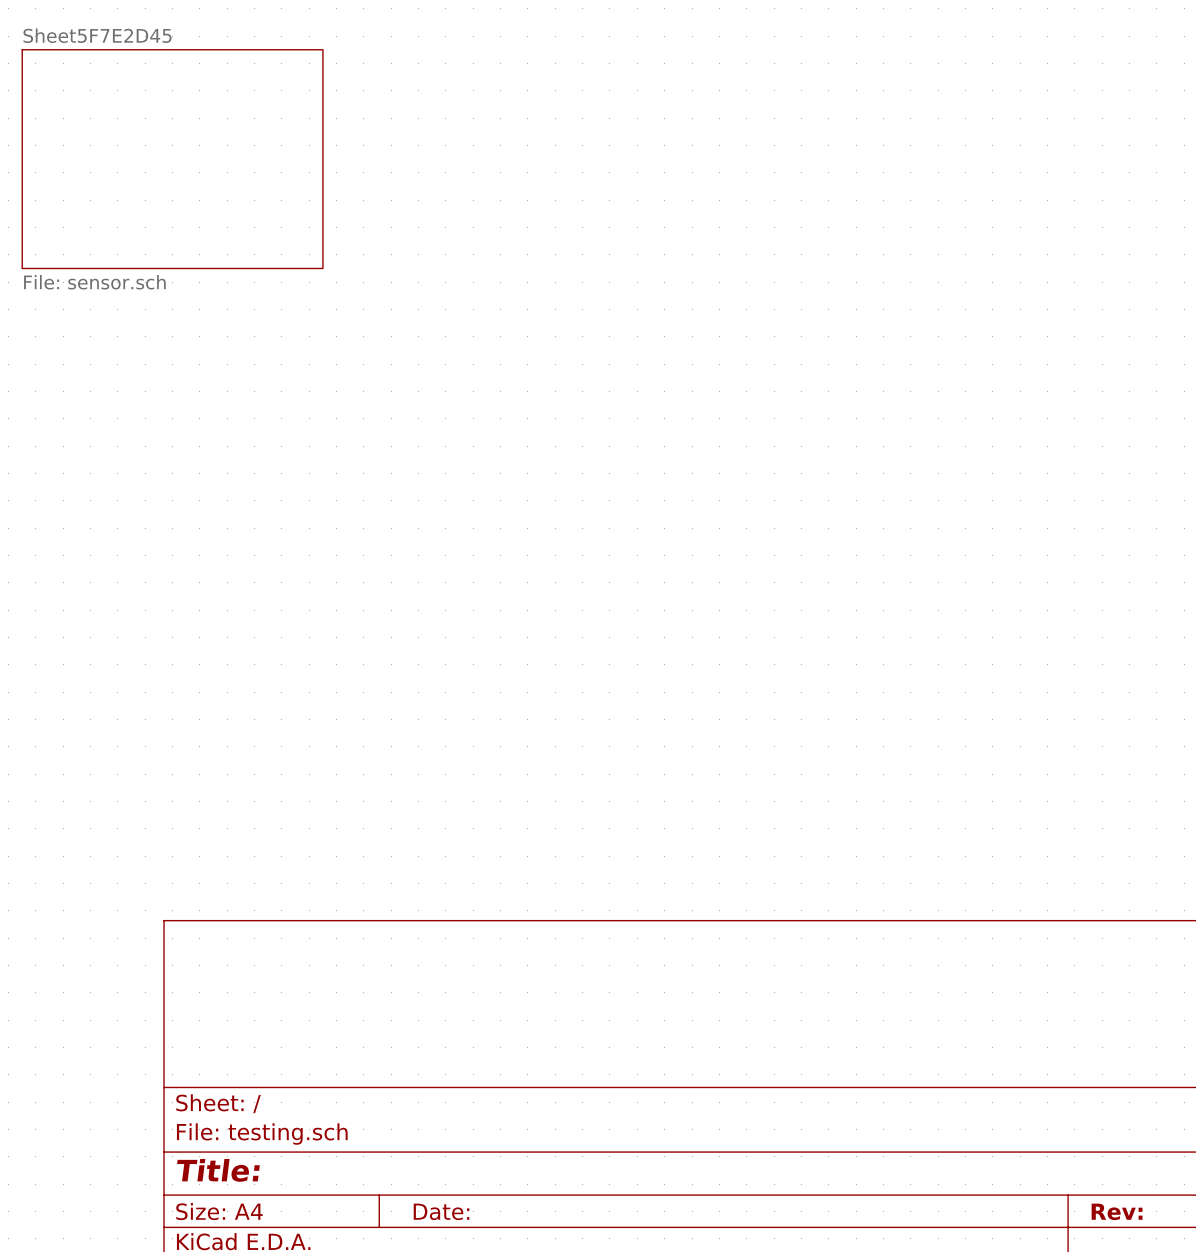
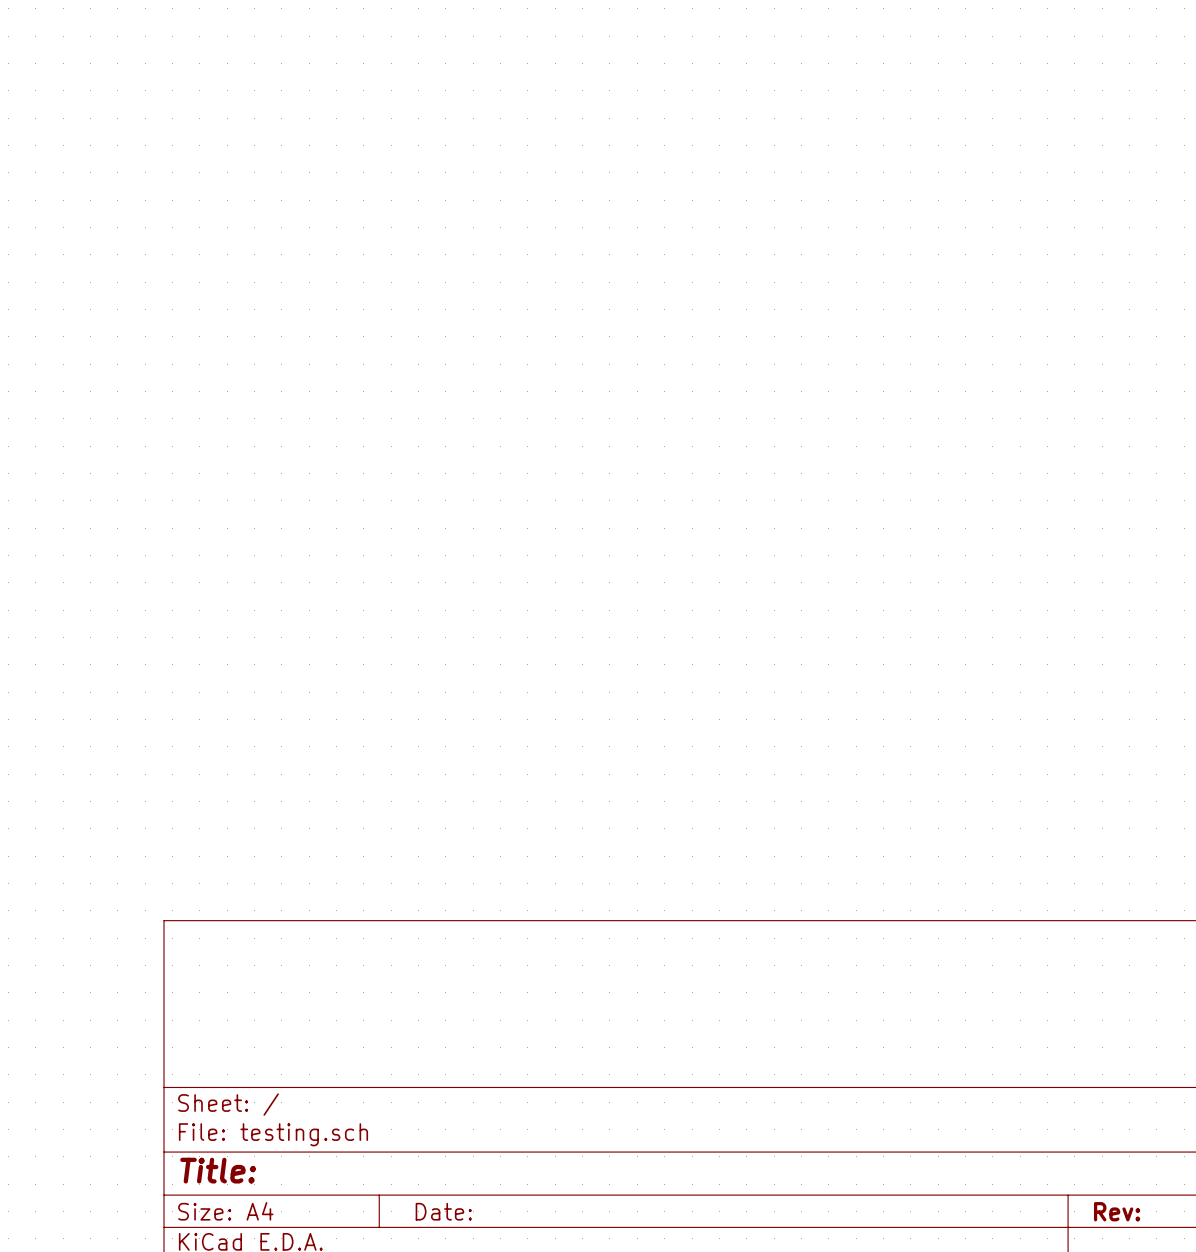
sheet Sheet5F7E2D45: File: sensor.sch (172, 159) -> none

